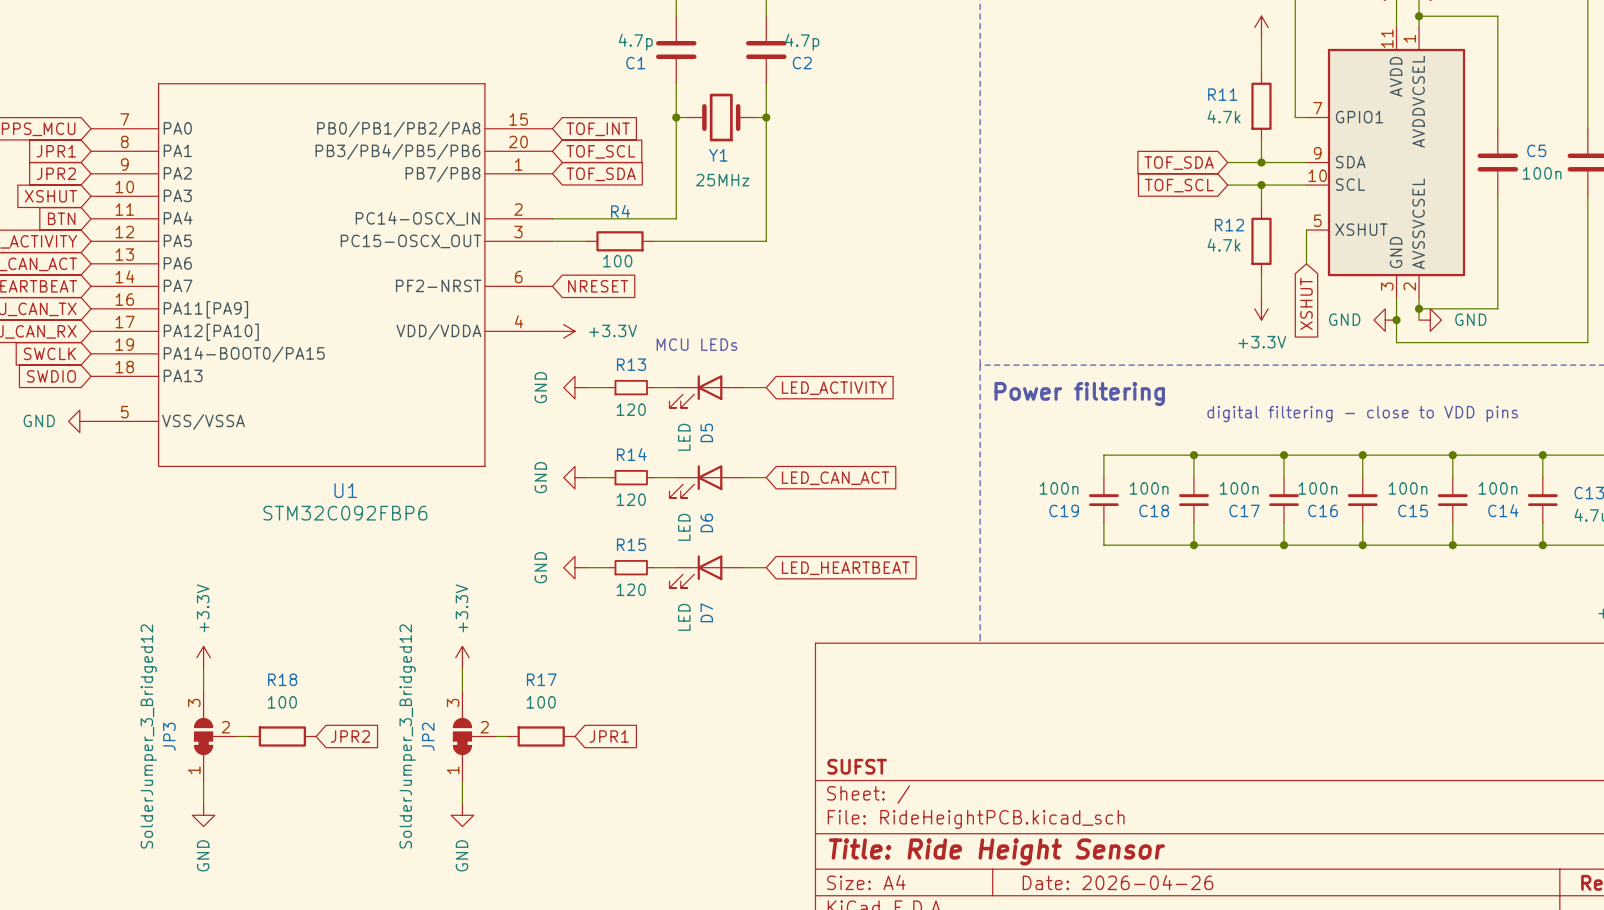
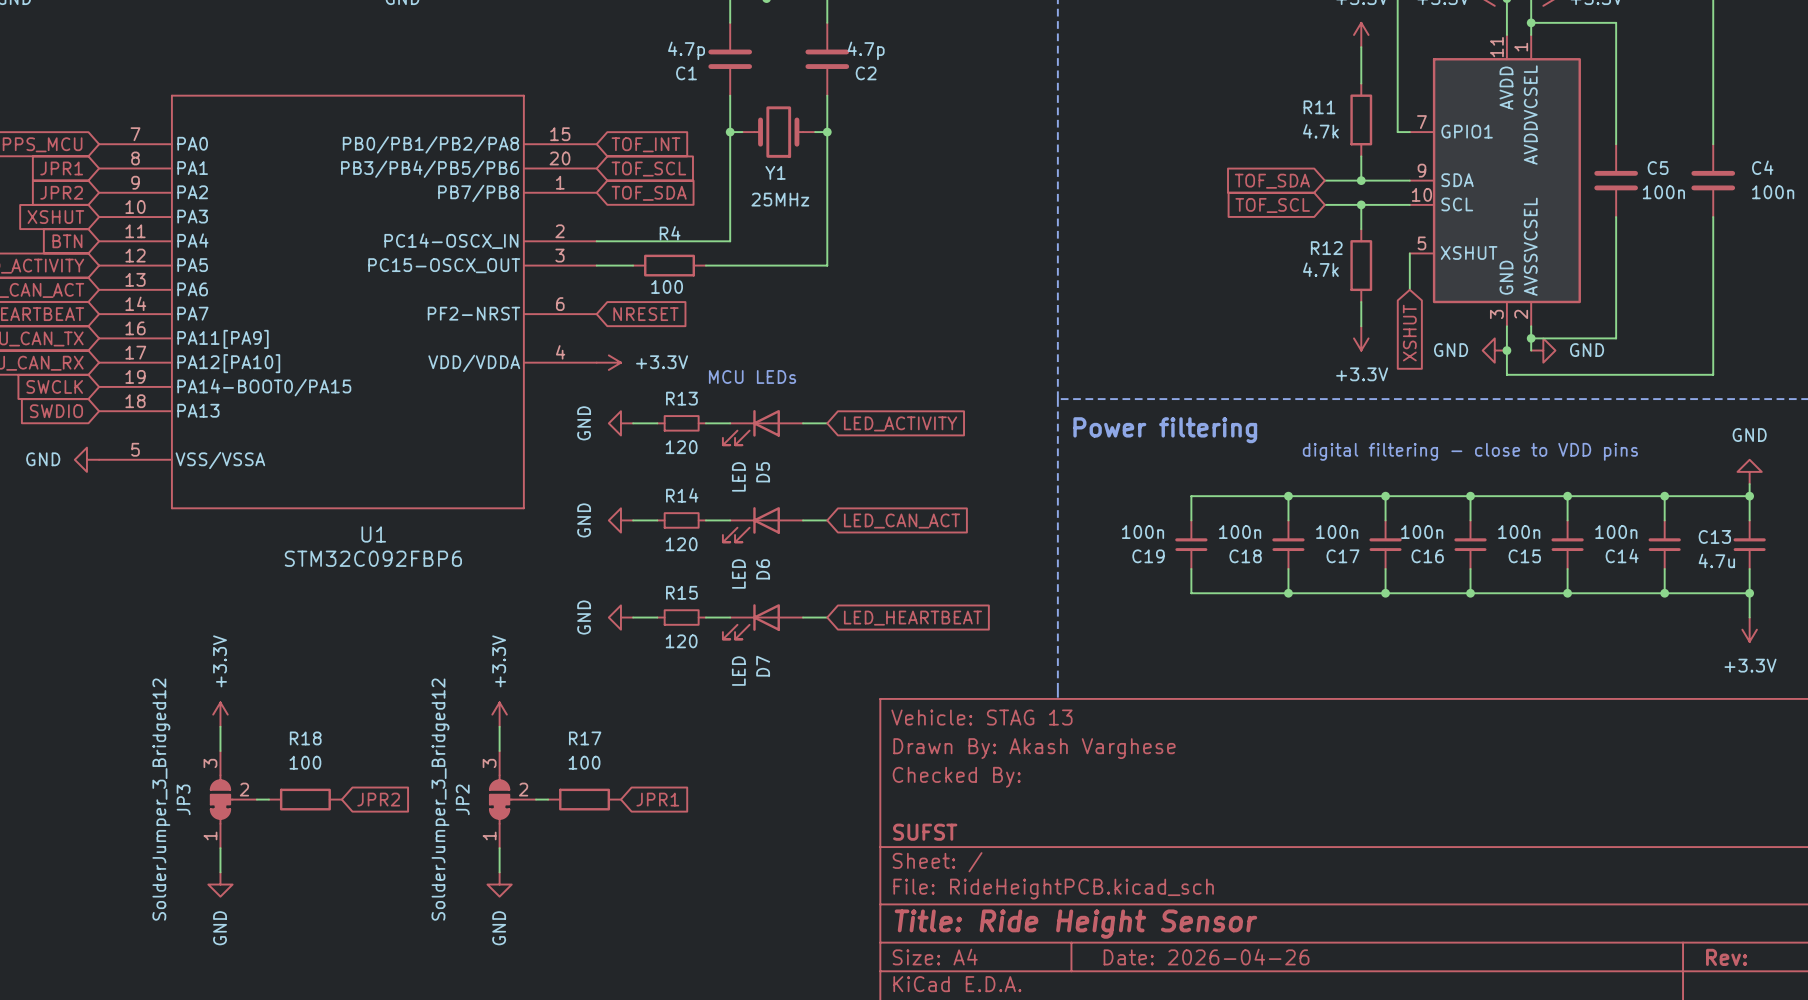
title block: none -> Vehicle: STAG 13 (981, 717)
title block: none -> Drawn By: Akash Varghese (1034, 748)
title block: none -> Checked By: (956, 777)

